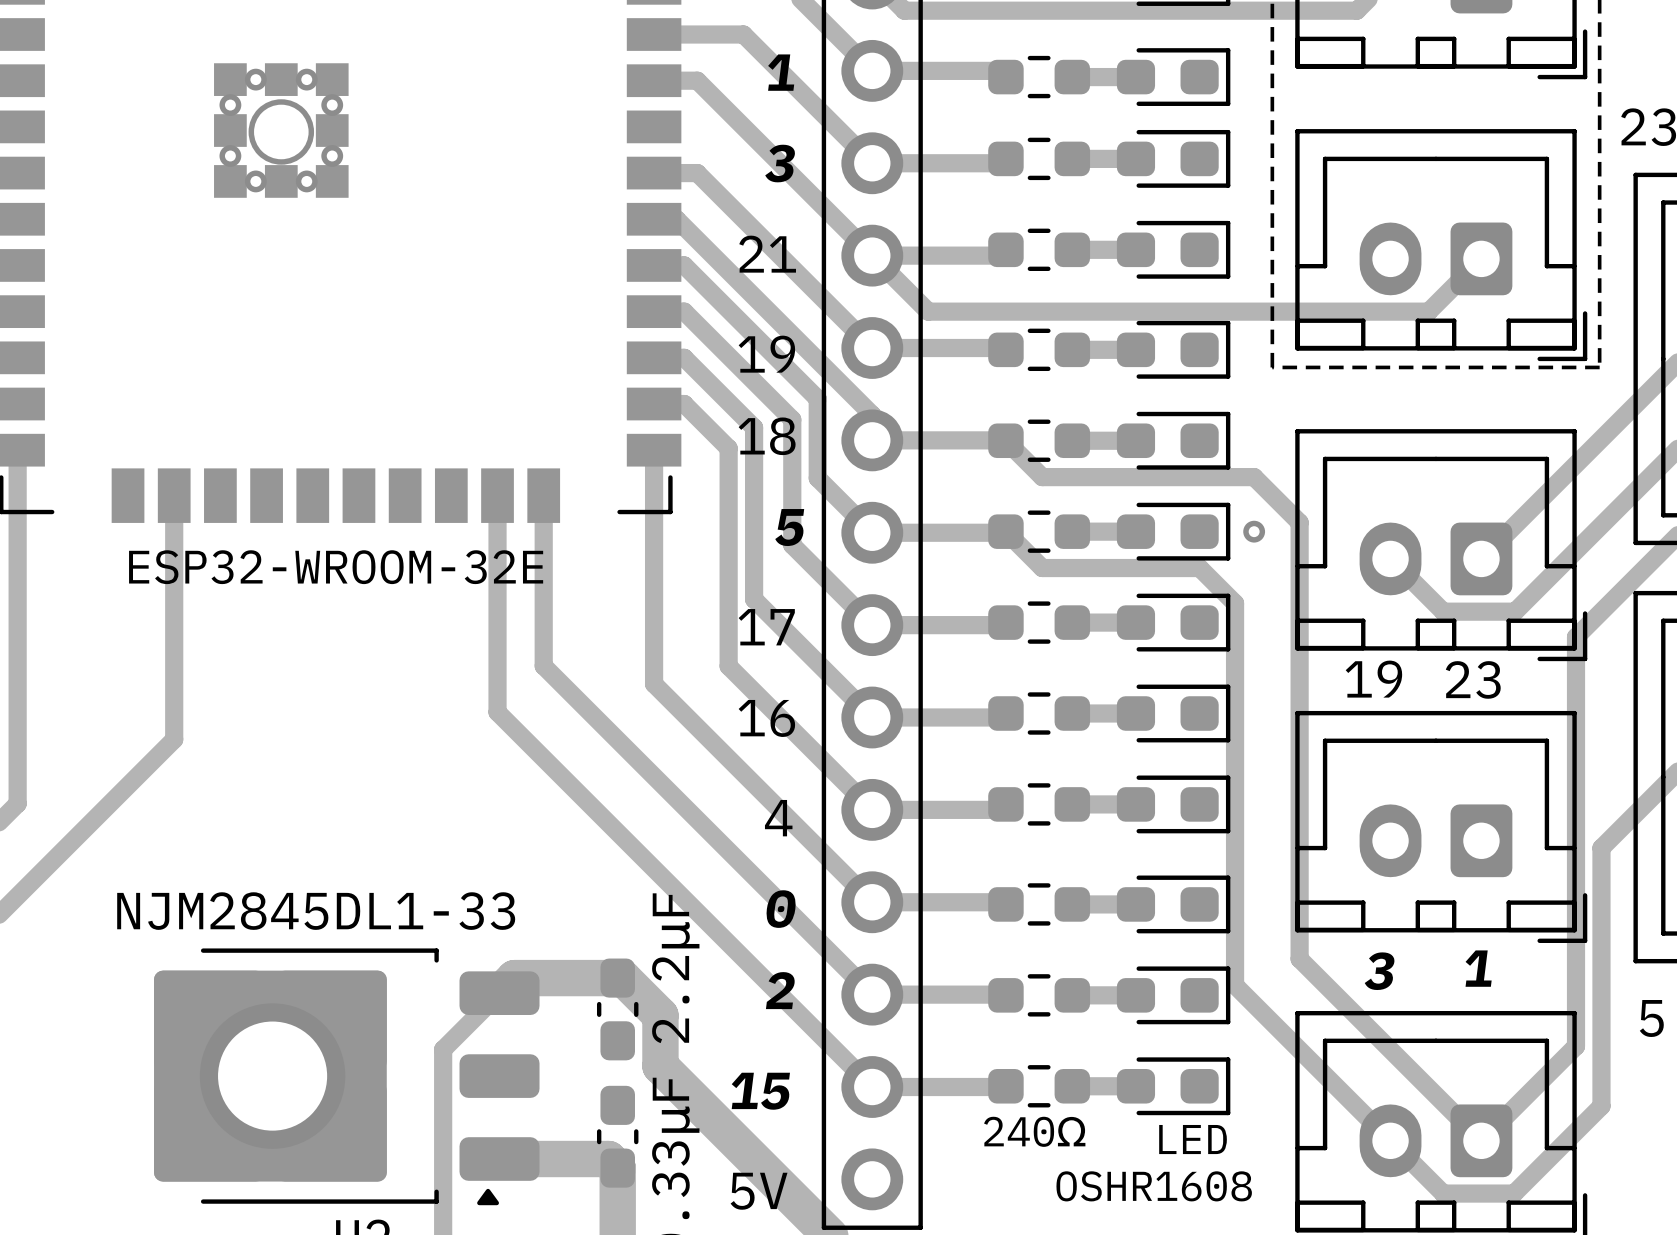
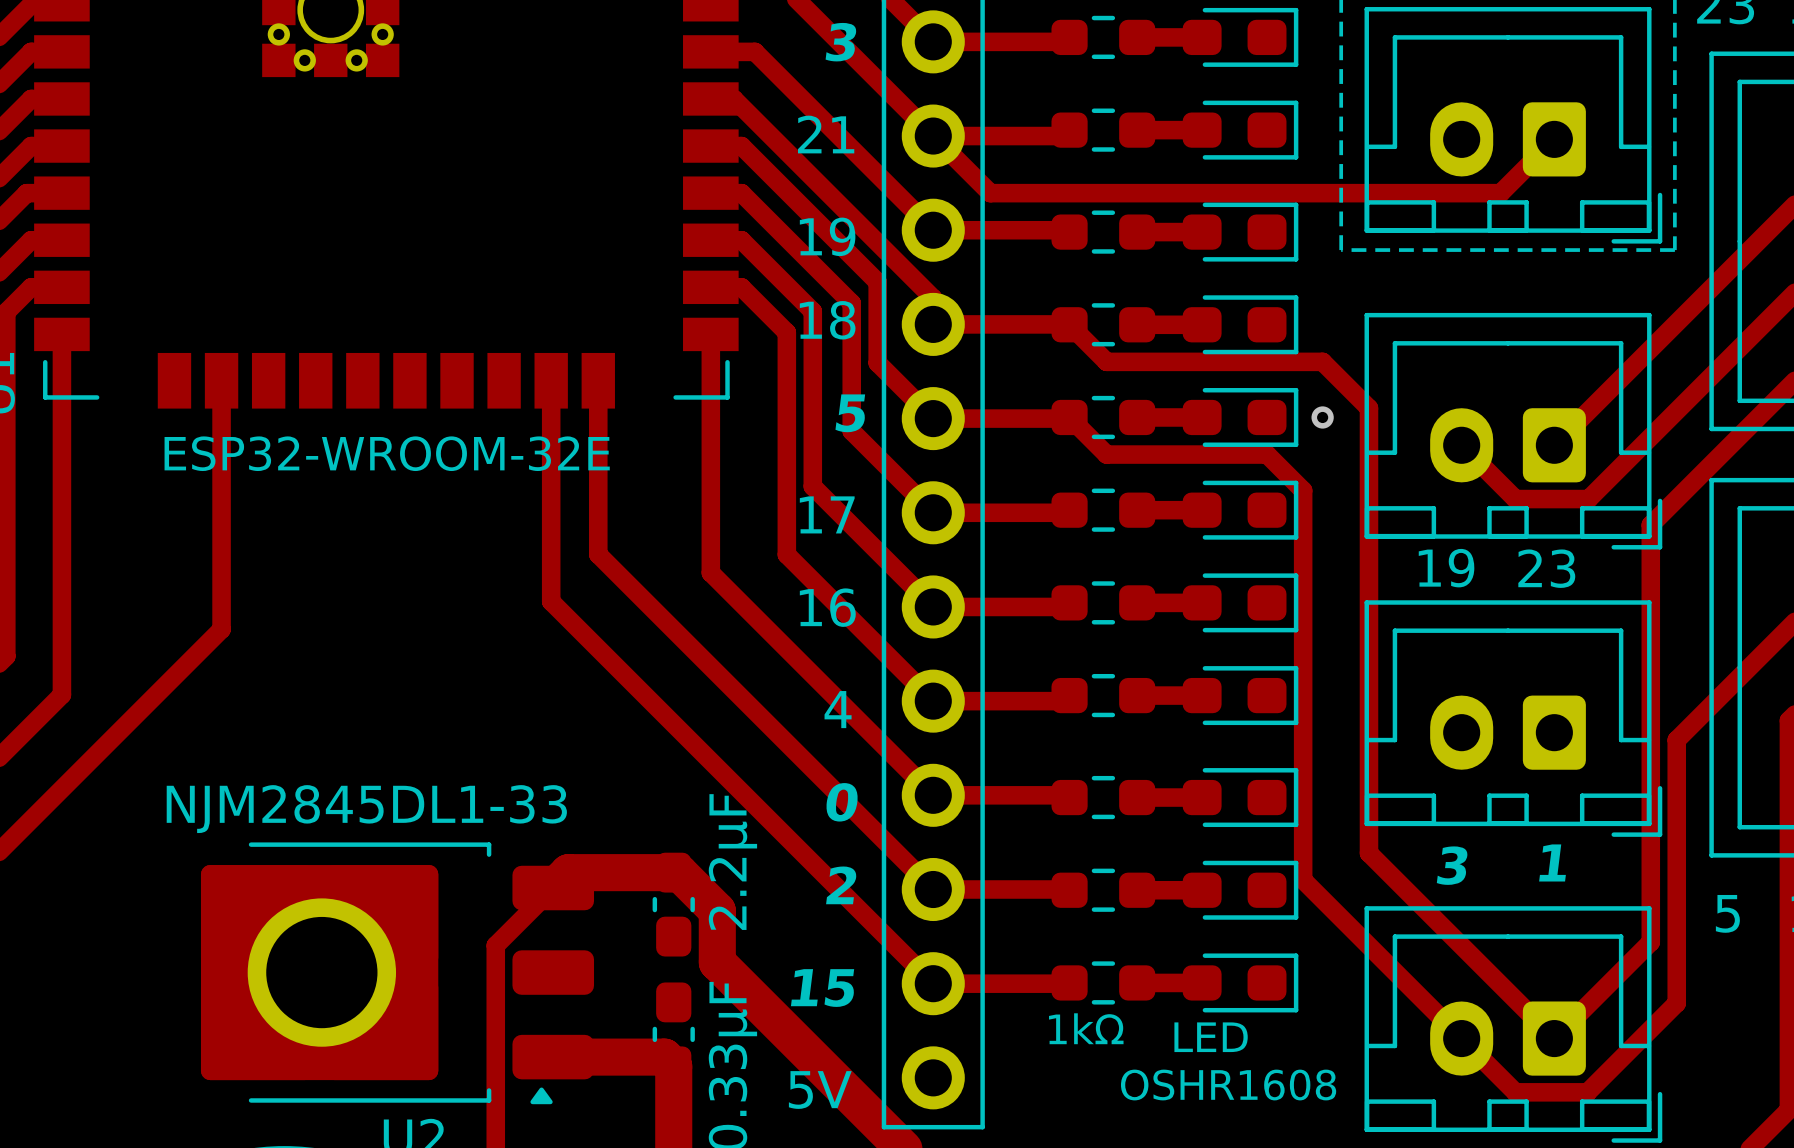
text: 240Ω (1034, 1131) -> 1kΩ (1086, 1028)

